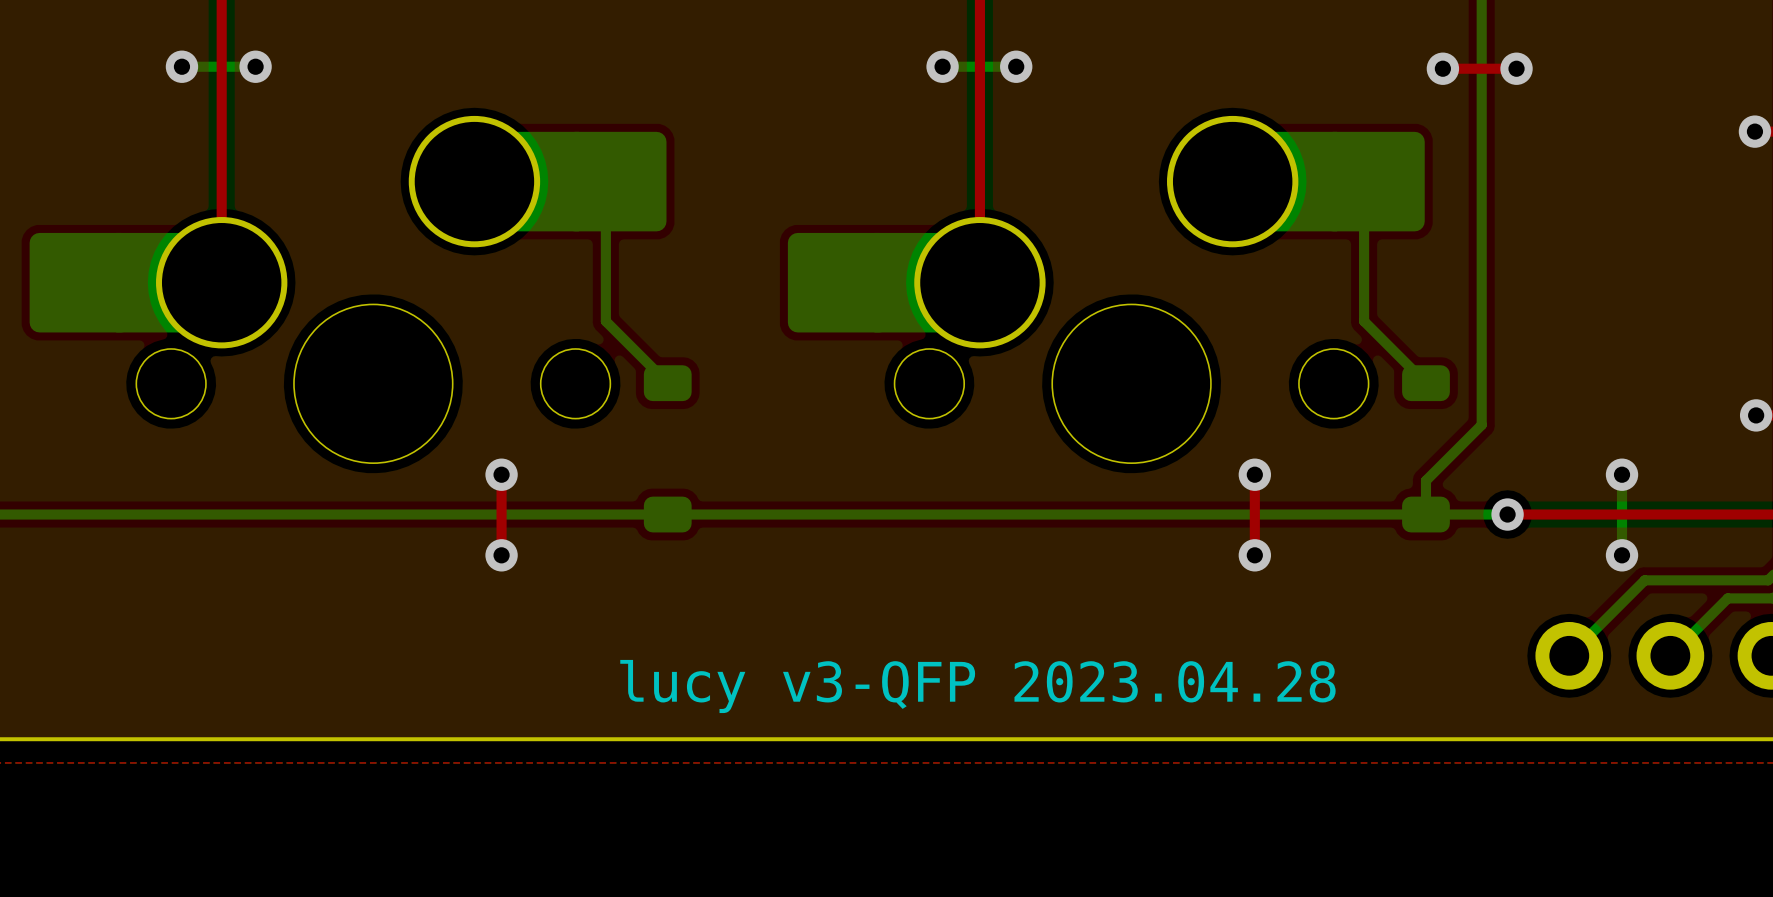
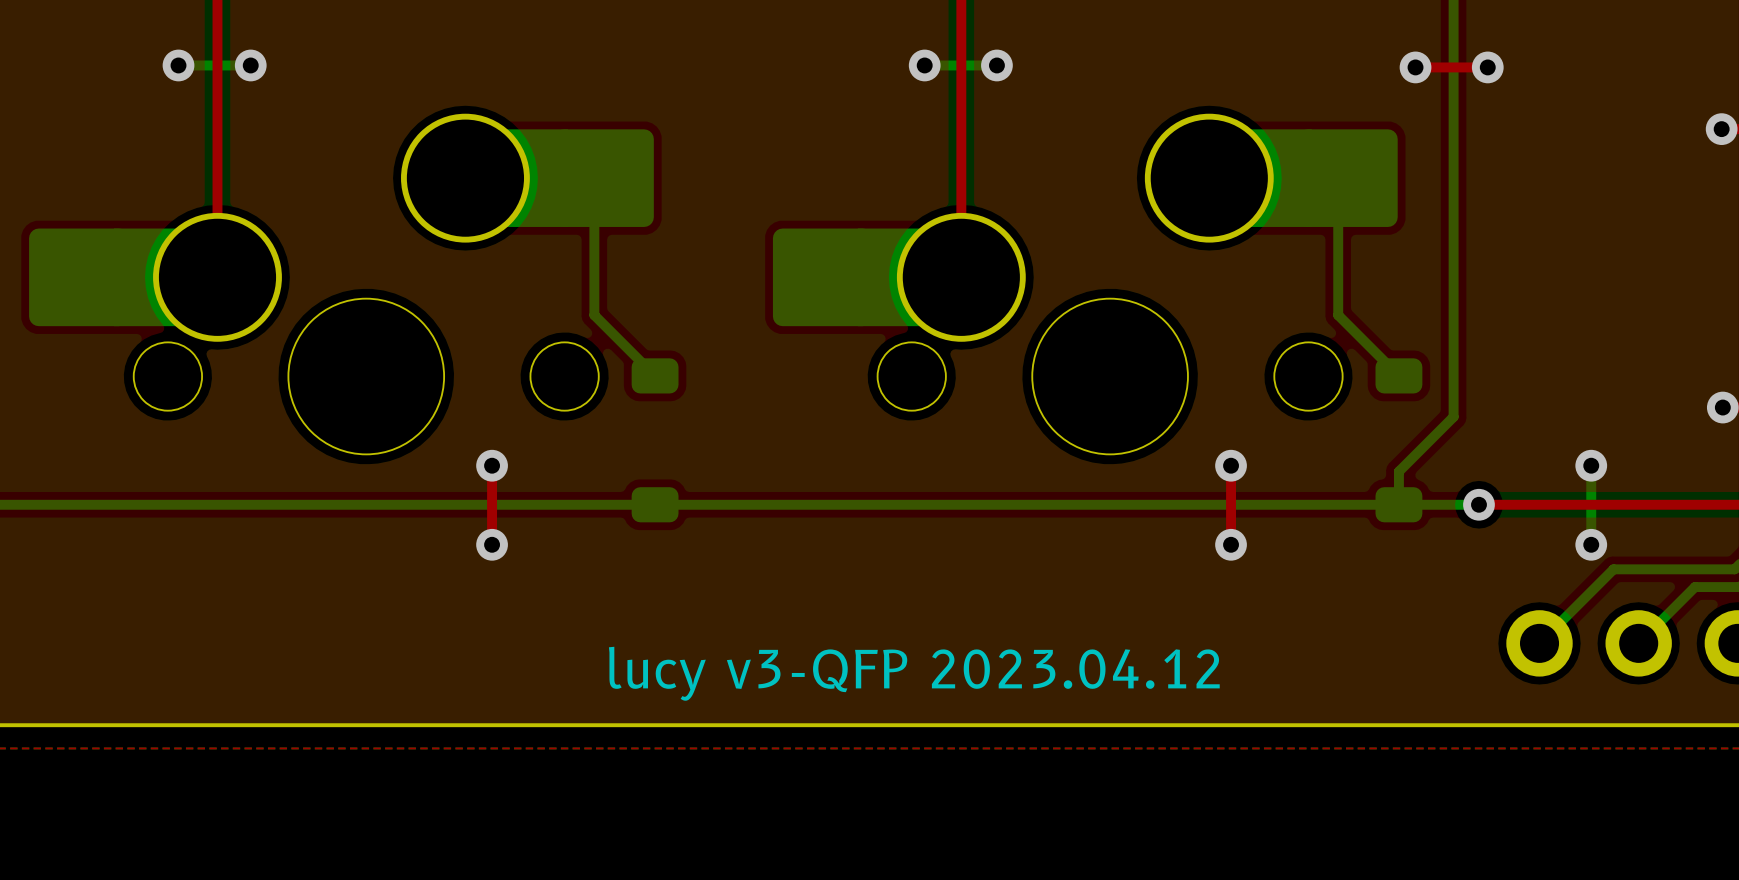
text: lucy v3-QFP 2023.04.28 (977, 686) -> lucy v3-QFP 2023.04.12 (914, 673)

